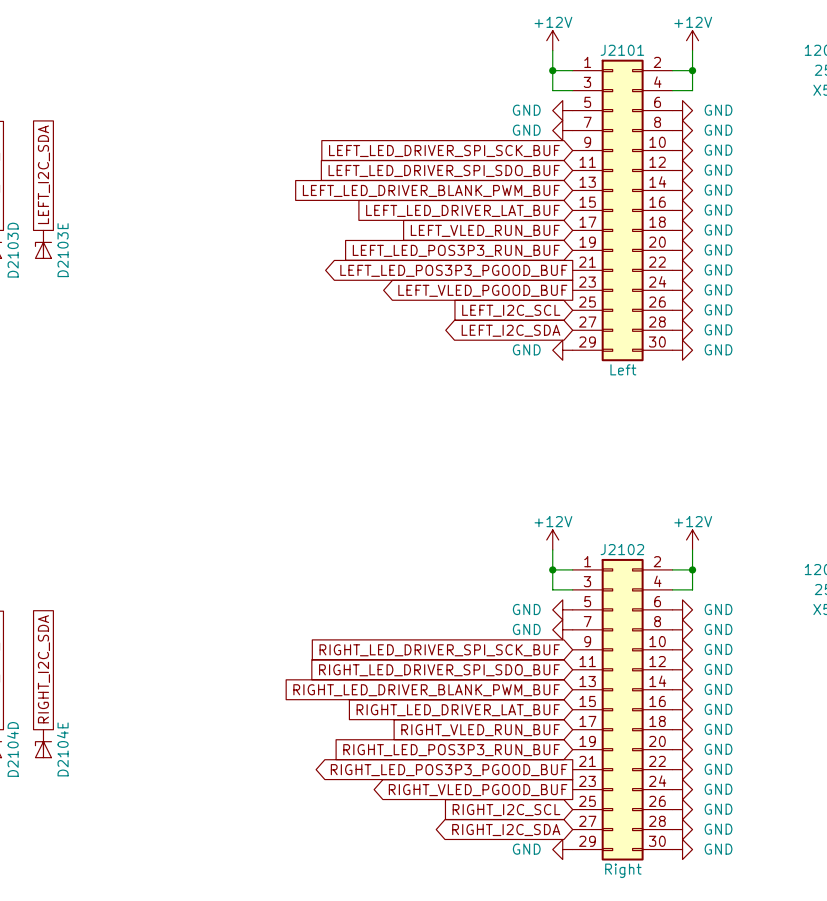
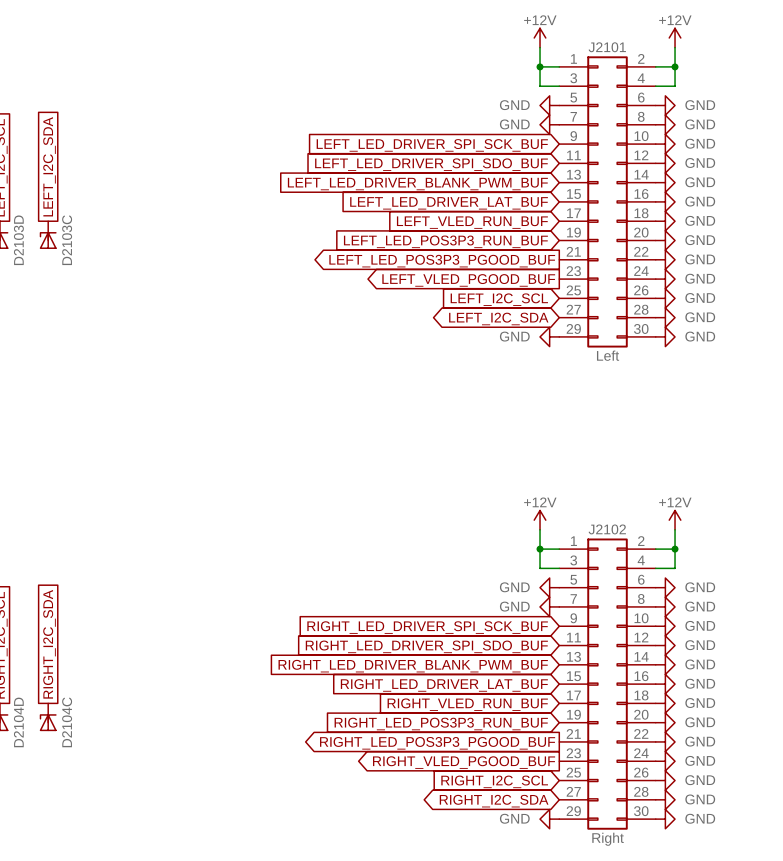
D2103E name: D2103E (63, 250) -> D2103C (67, 240)
D2104E name: D2104E (62, 749) -> D2104C (67, 722)

